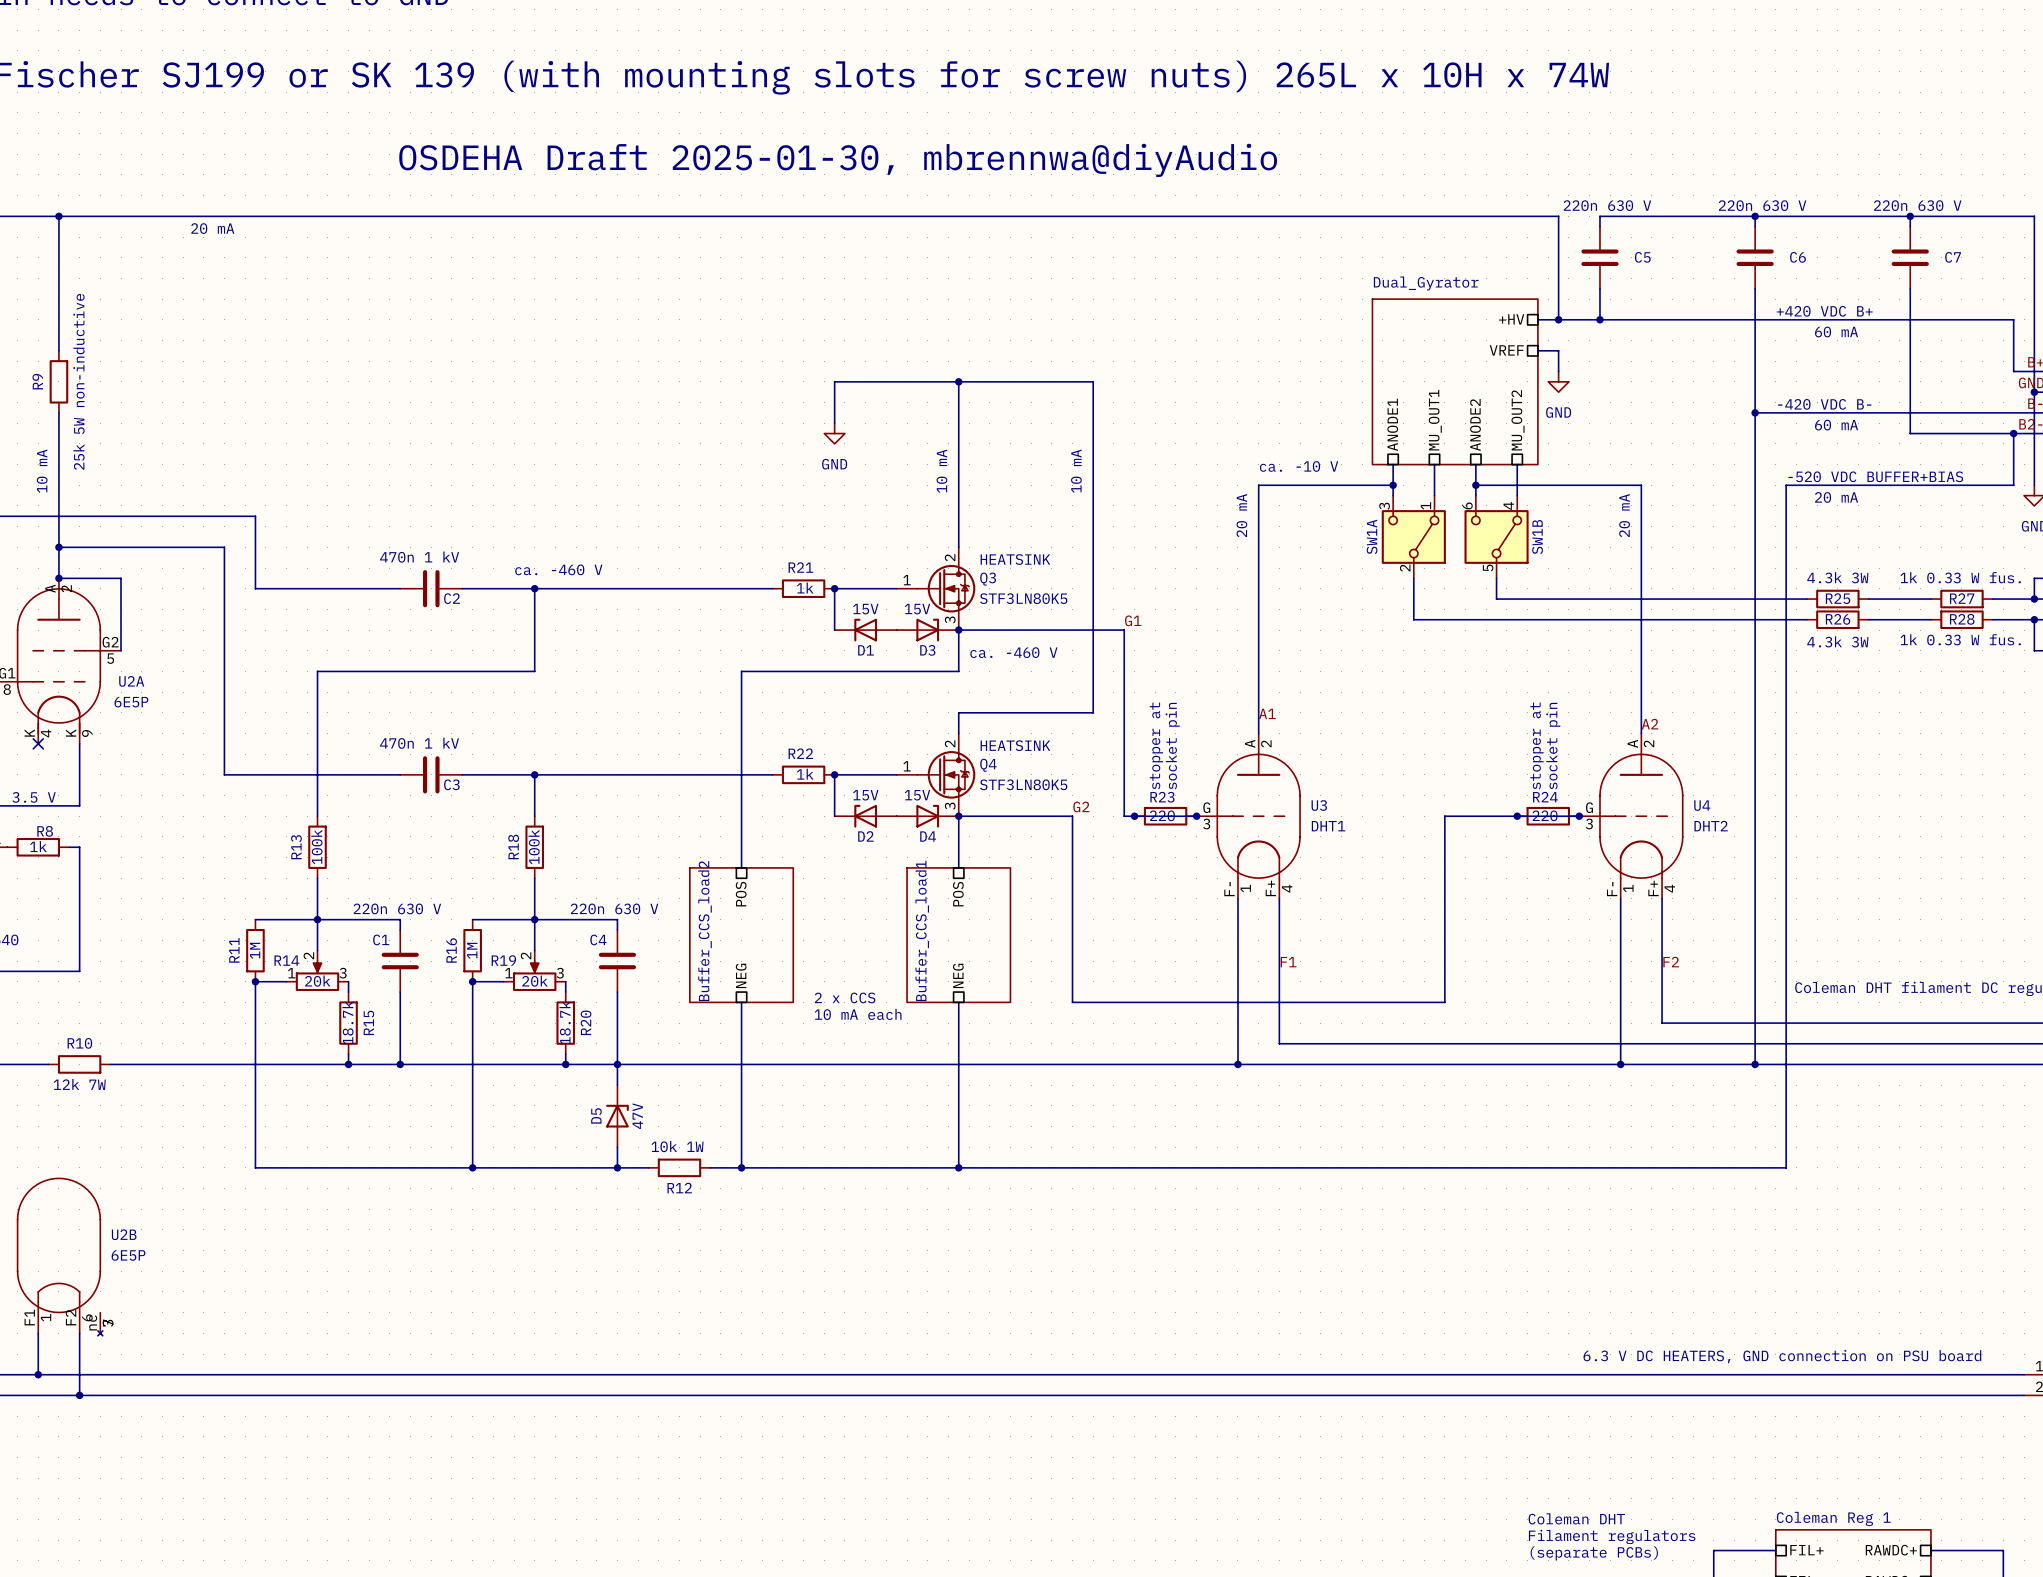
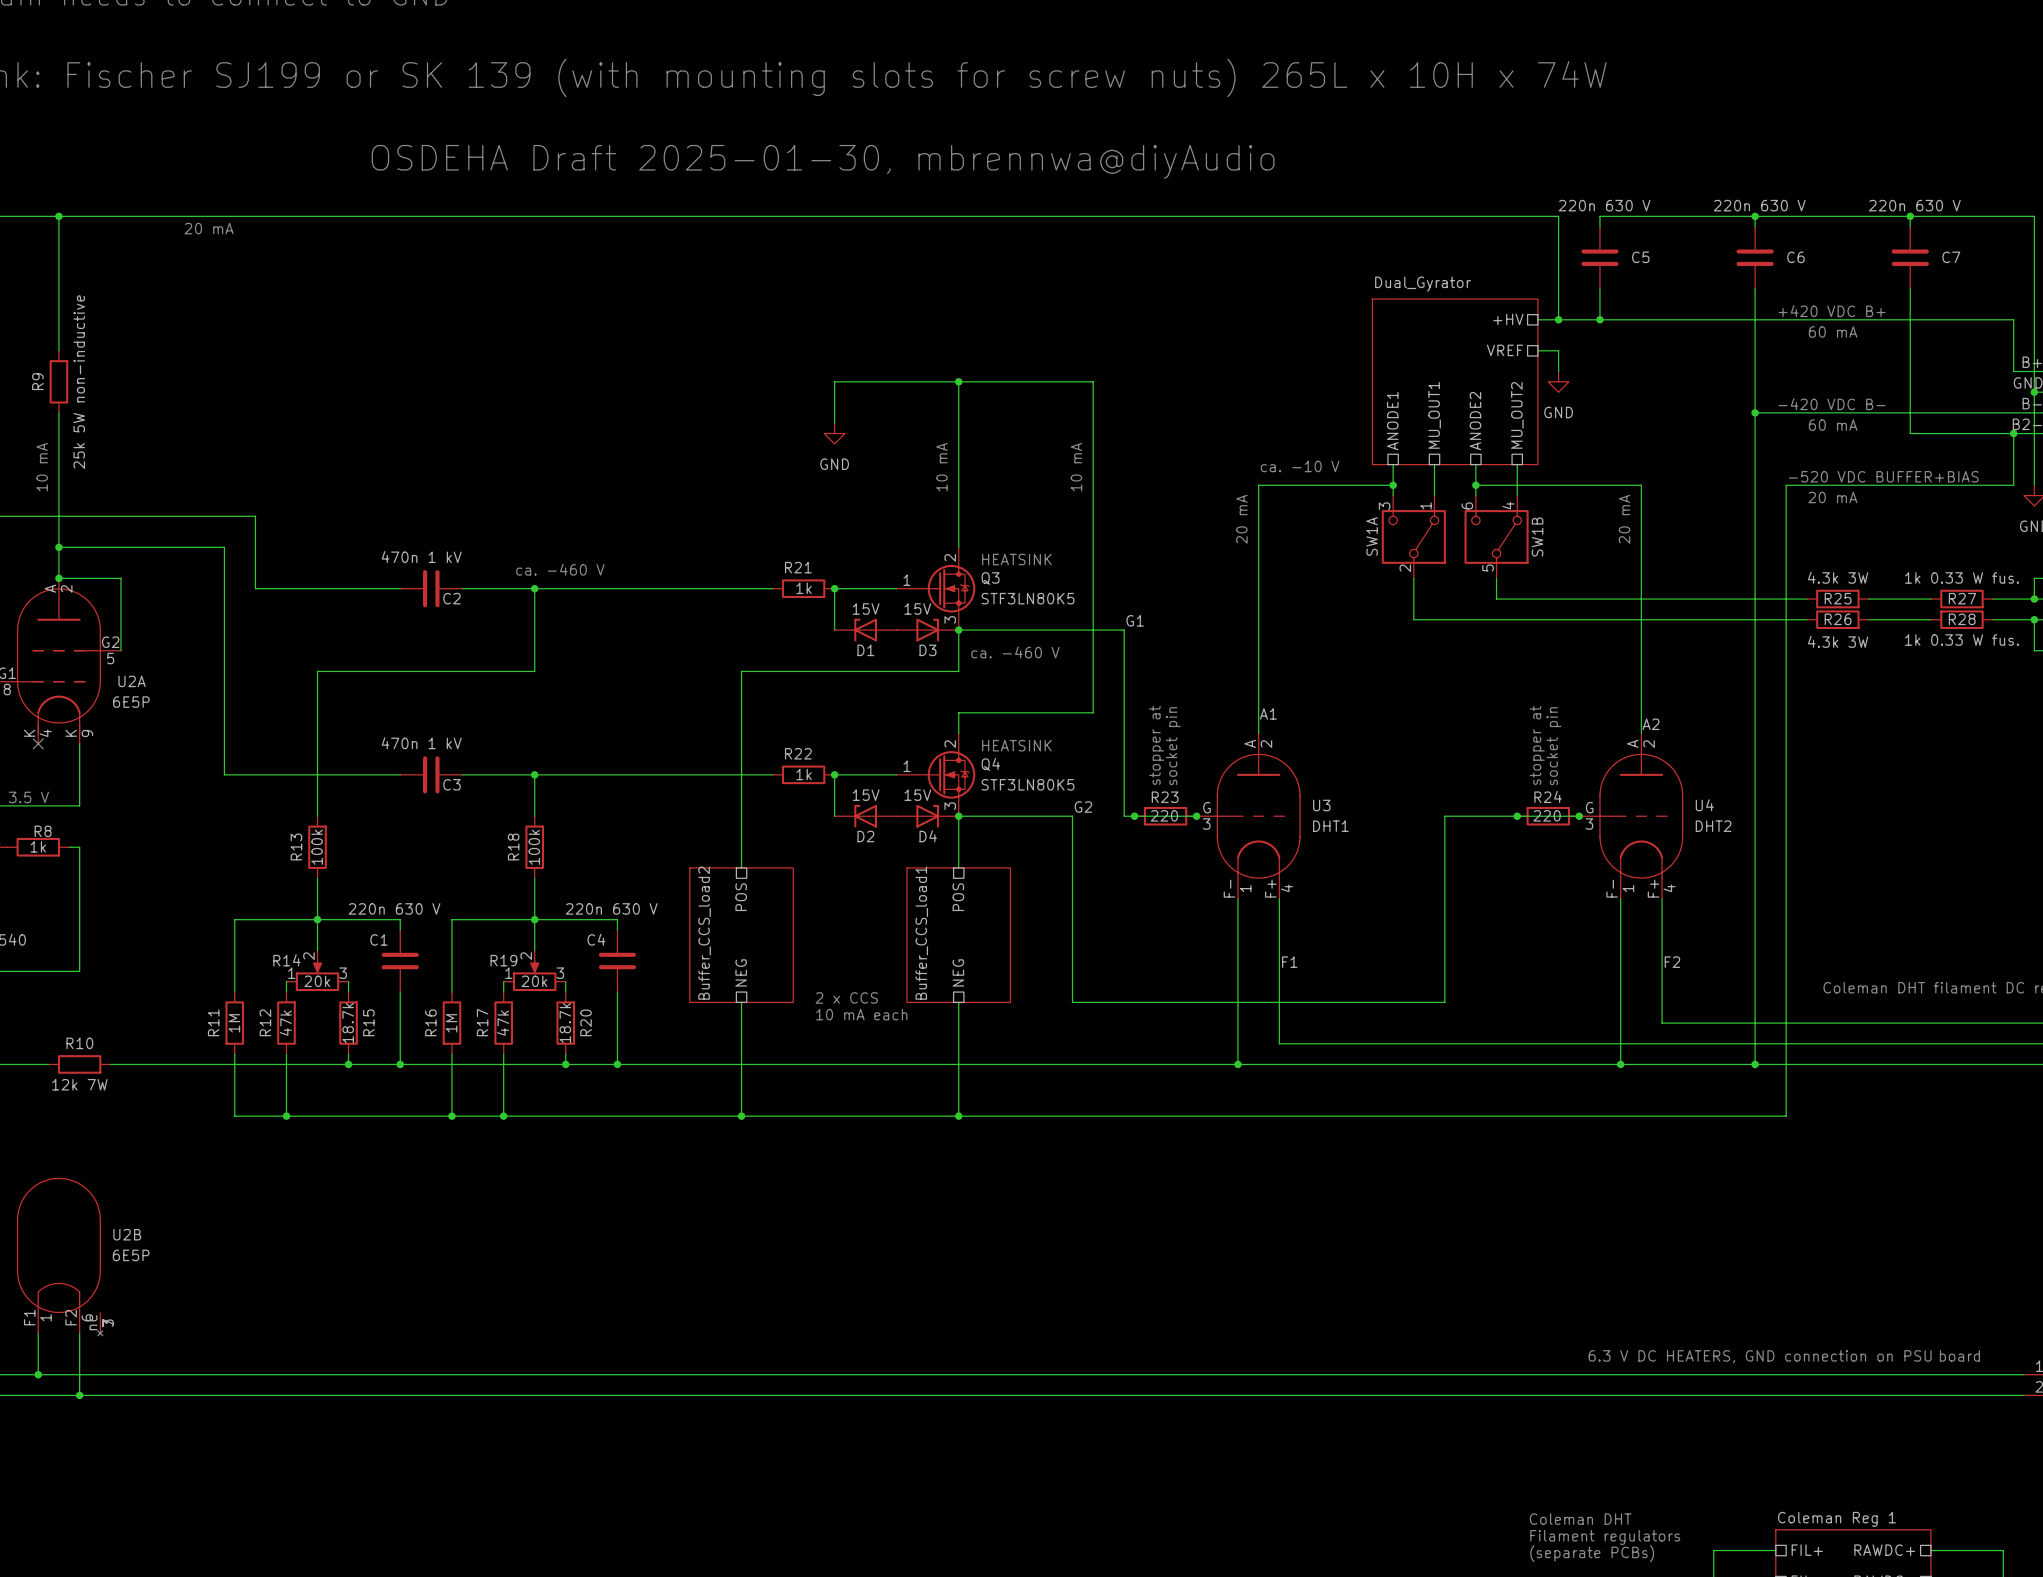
wire: none -> (255, 919) (234, 919) (234, 992)
wire: none -> (472, 919) (451, 919) (451, 992)
R11 position: (255, 950) -> (234, 1023)
R16 position: (472, 950) -> (451, 1023)
junction: (255, 981) -> none
wire: (286, 981) (255, 981) (255, 1167) (648, 1167) -> (286, 981) (286, 992)
junction: (472, 981) -> none
wire: (503, 981) (472, 981) (472, 1167) -> (503, 981) (503, 992)
R17: none -> 47k (503, 1023)
wire: none -> (286, 1054) (286, 1116)
wire: none -> (451, 1054) (451, 1116)
wire: none -> (503, 1054) (503, 1116)
wire: (617, 1064) (617, 1085) -> none
junction: none -> (286, 1116)
junction: none -> (451, 1116)
junction: none -> (503, 1116)
D5: 47V (617, 1116) -> none
wire: (741, 1116) (741, 1167) -> none
junction: none -> (741, 1116)
wire: (958, 1116) (958, 1167) -> none
junction: none -> (958, 1116)
wire: (1786, 1116) (1786, 1167) (710, 1167) -> (1786, 1116) (234, 1116) (234, 1054)
R12 value: 10k 1W (677, 1146) -> 47k (285, 1023)
wire: (617, 1147) (617, 1167) -> none
junction: (472, 1167) -> none
junction: (617, 1167) -> none
R12 rotation: 0° (679, 1167) -> 90° clockwise (286, 1023)
R12 position: (679, 1167) -> (286, 1023)
junction: (741, 1167) -> none
junction: (958, 1167) -> none

